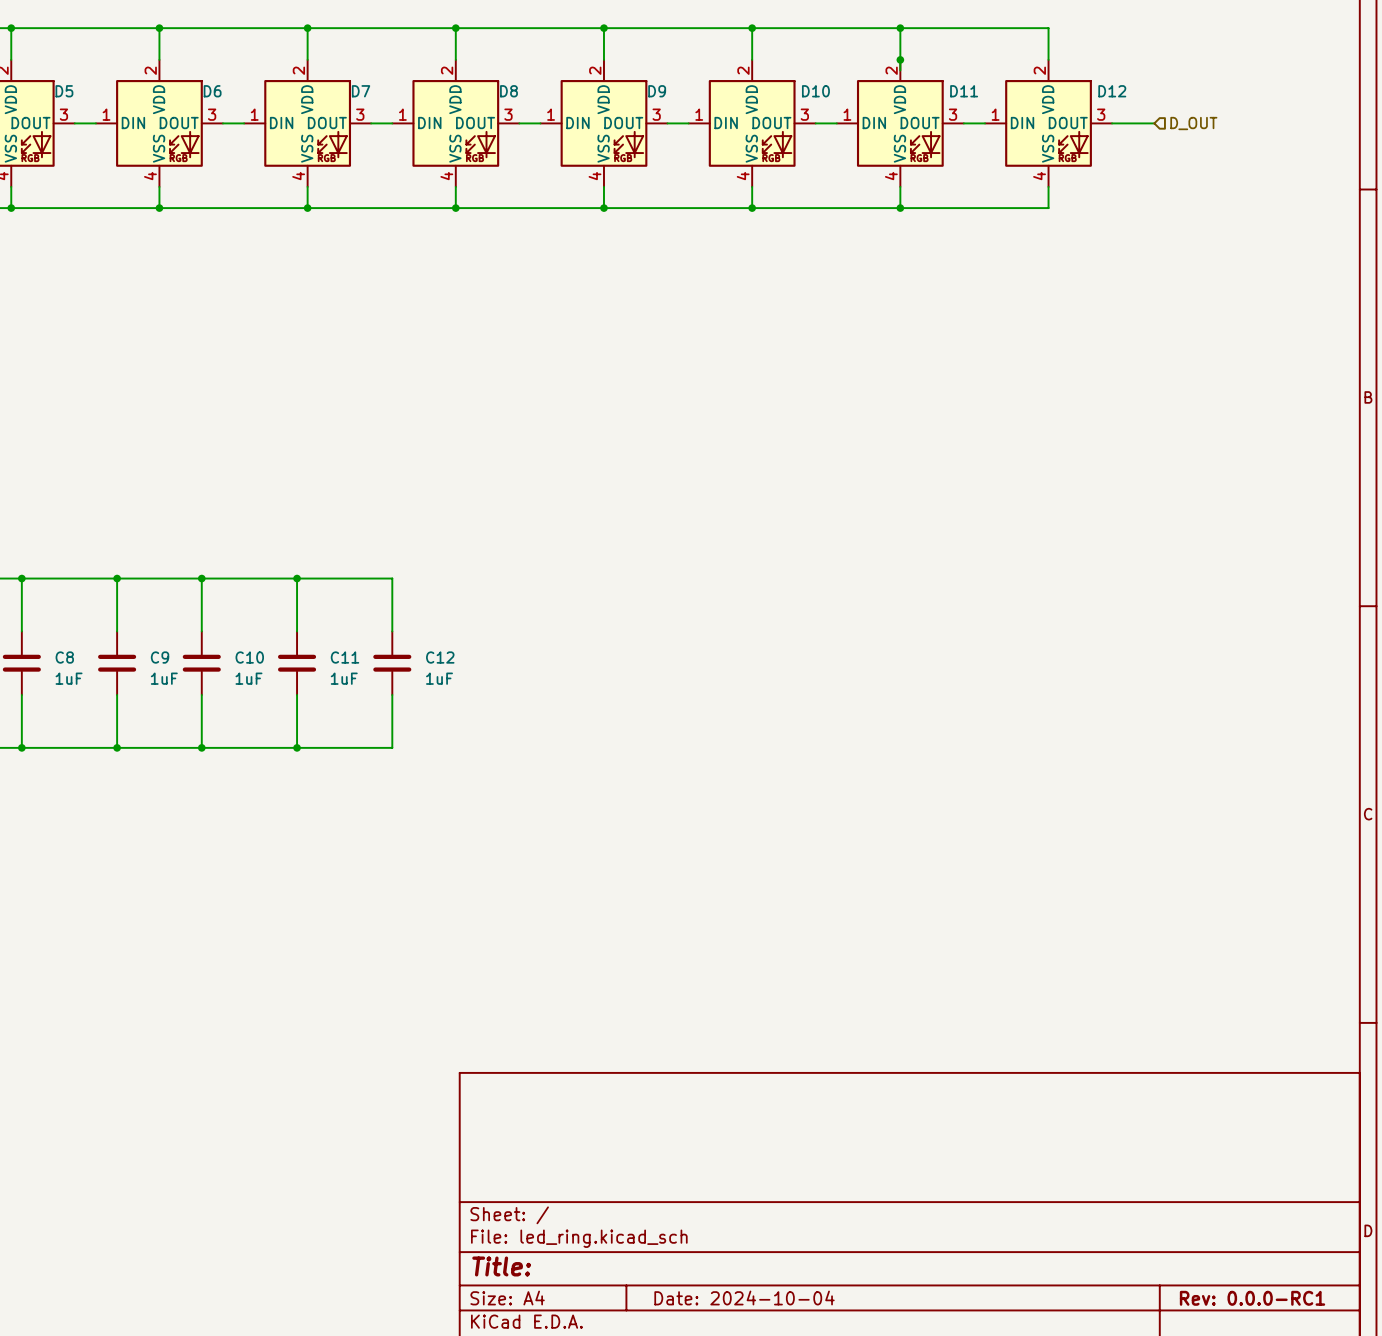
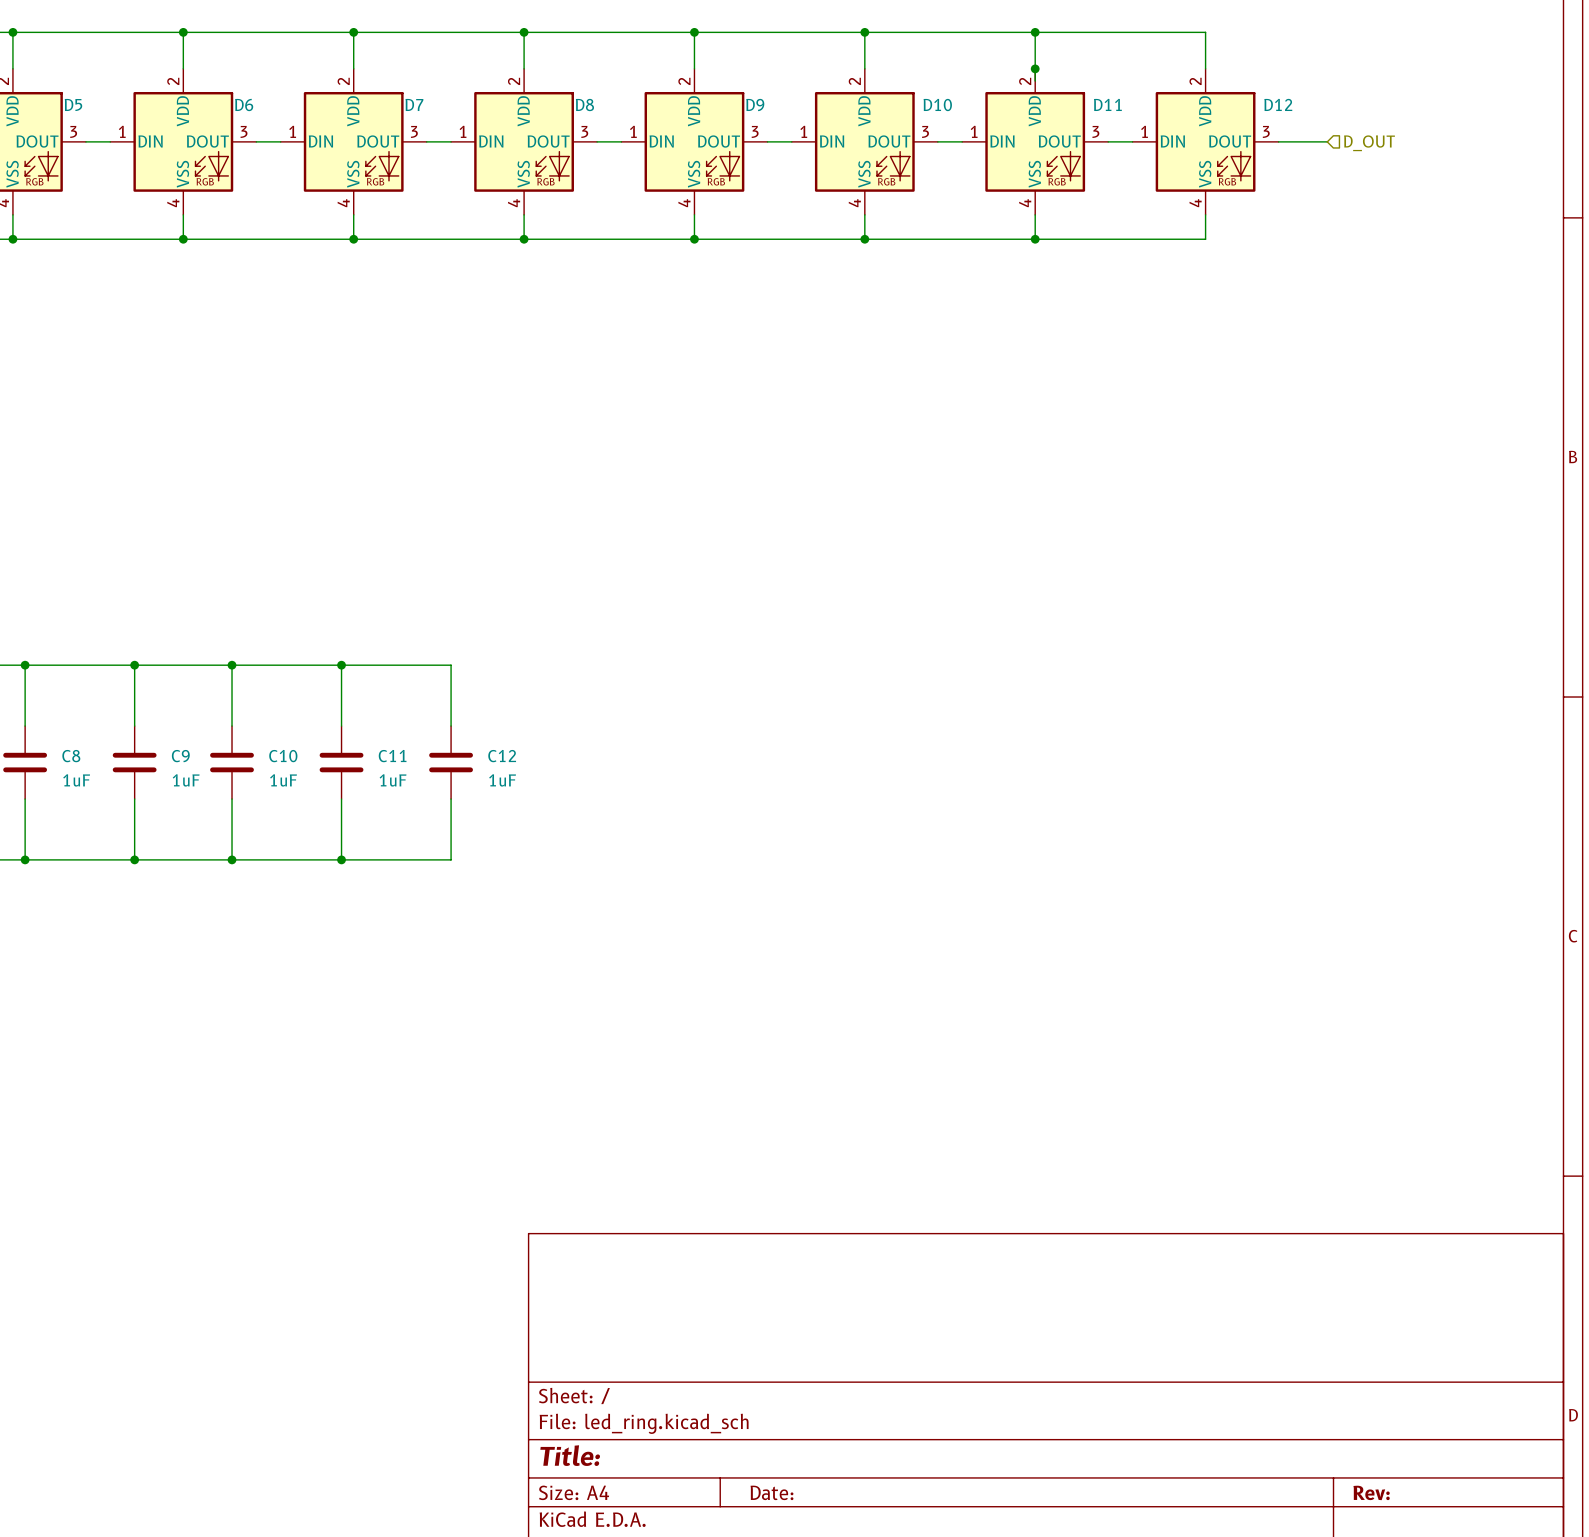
title block: Date: 2024-10-04 (744, 1298) -> Date: (771, 1492)
title block: Rev: 0.0.0-RC1 (1252, 1298) -> Rev: (1371, 1492)

